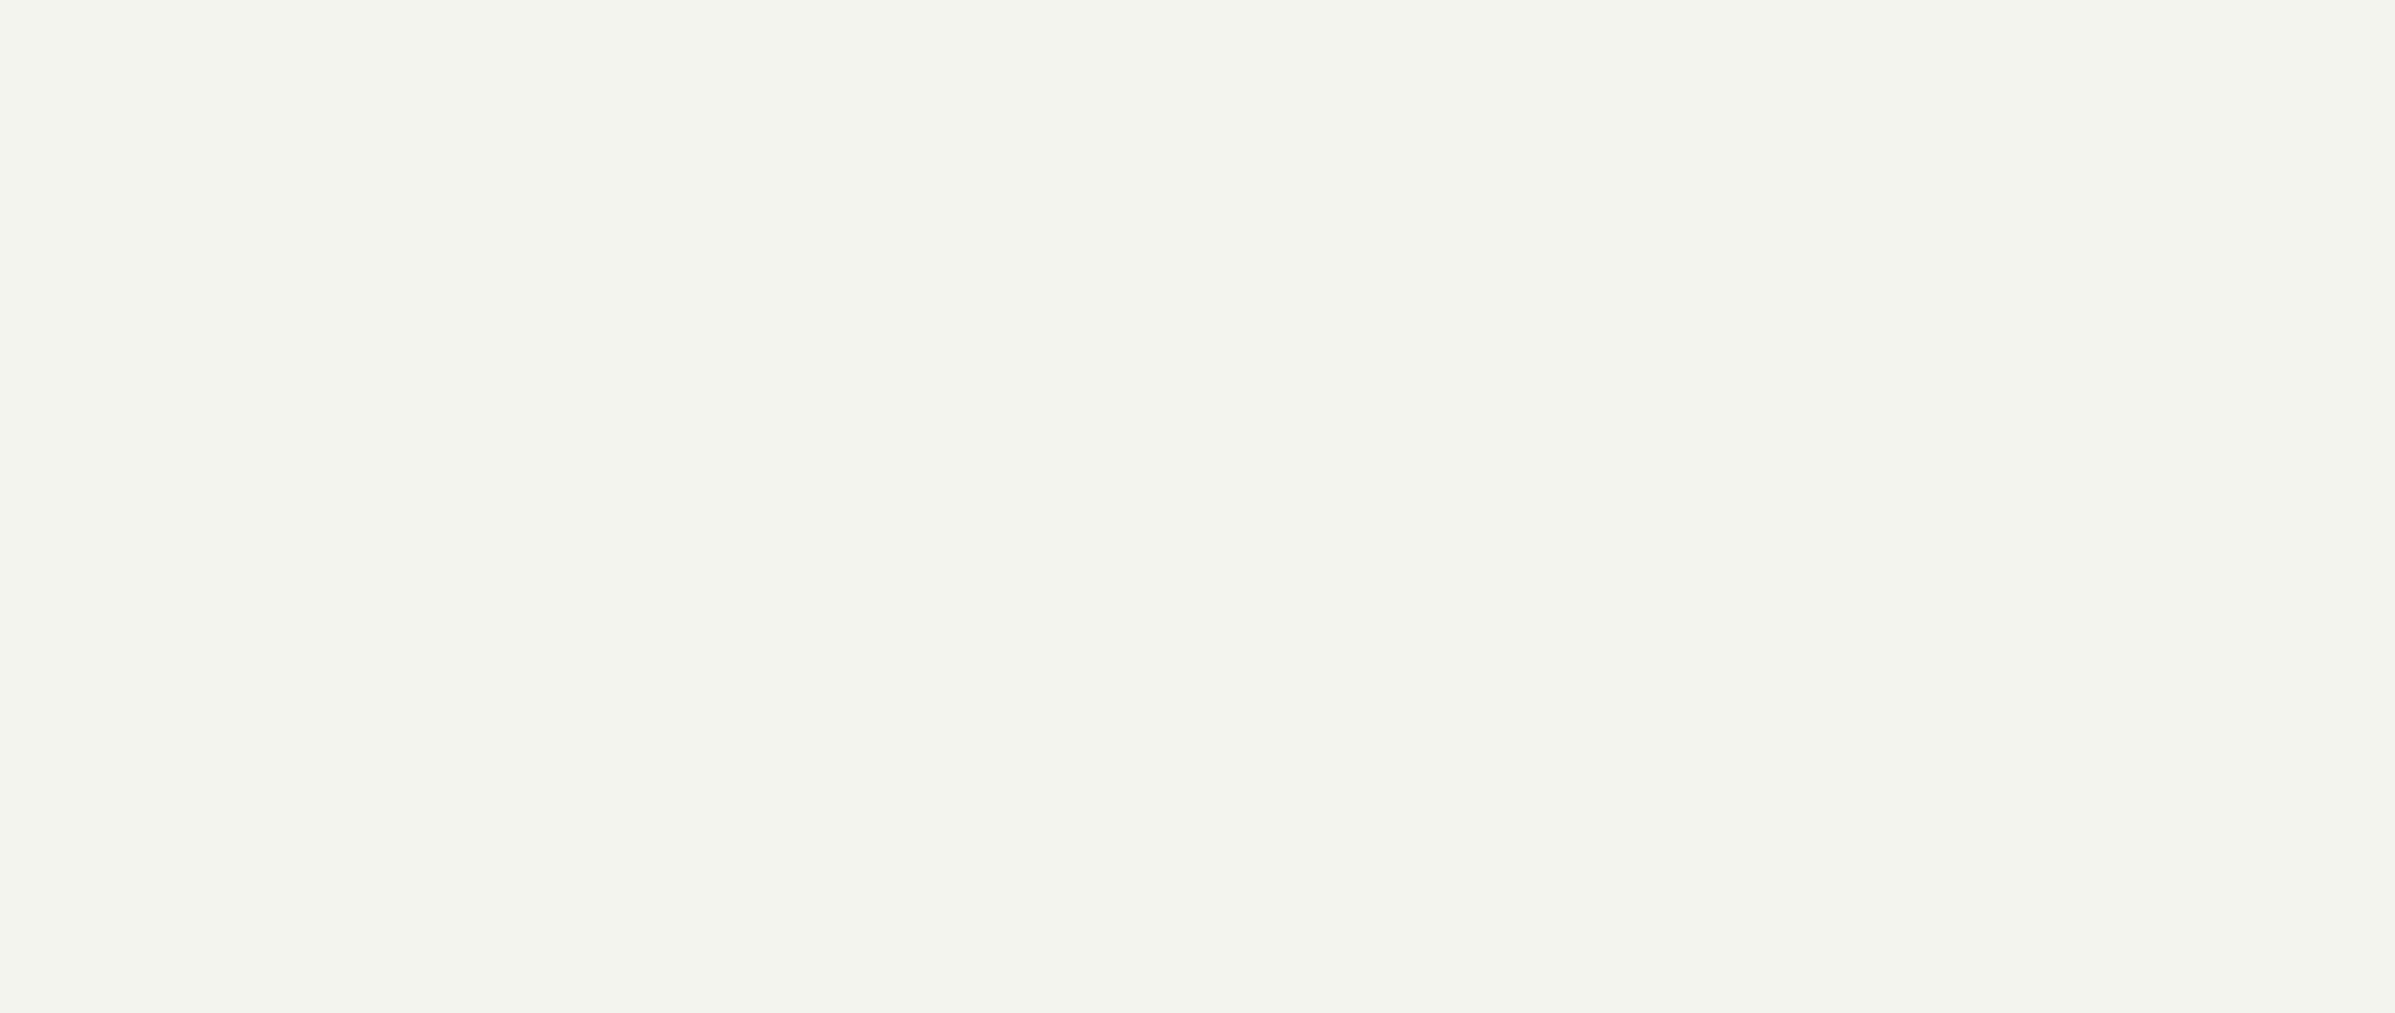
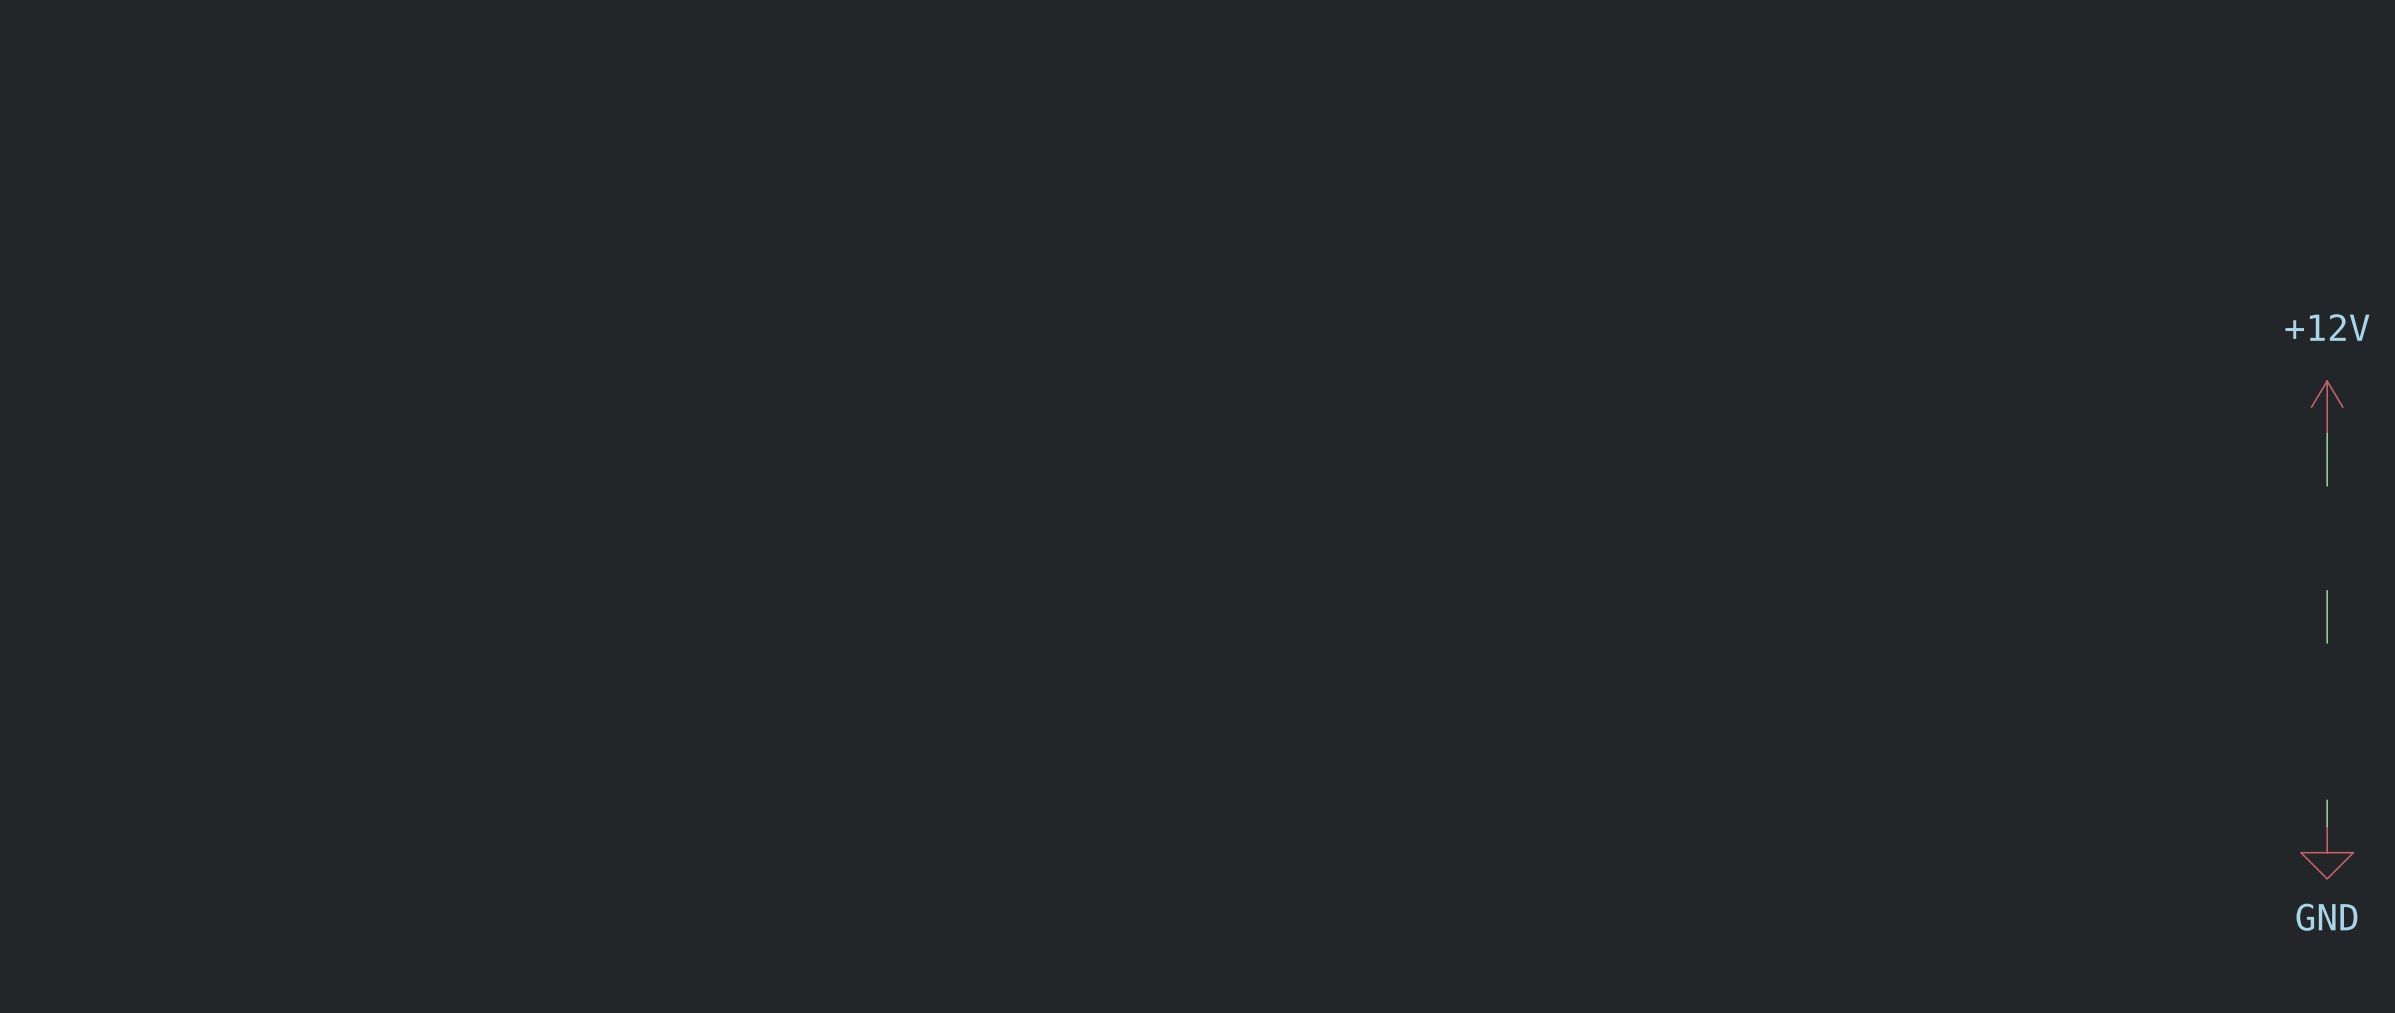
power symbol: none -> +12V (2327, 407)
wire: none -> (2327, 433) (2327, 485)
wire: none -> (2327, 590) (2327, 643)
wire: none -> (2327, 800) (2327, 826)
power symbol: none -> GND (2327, 852)

